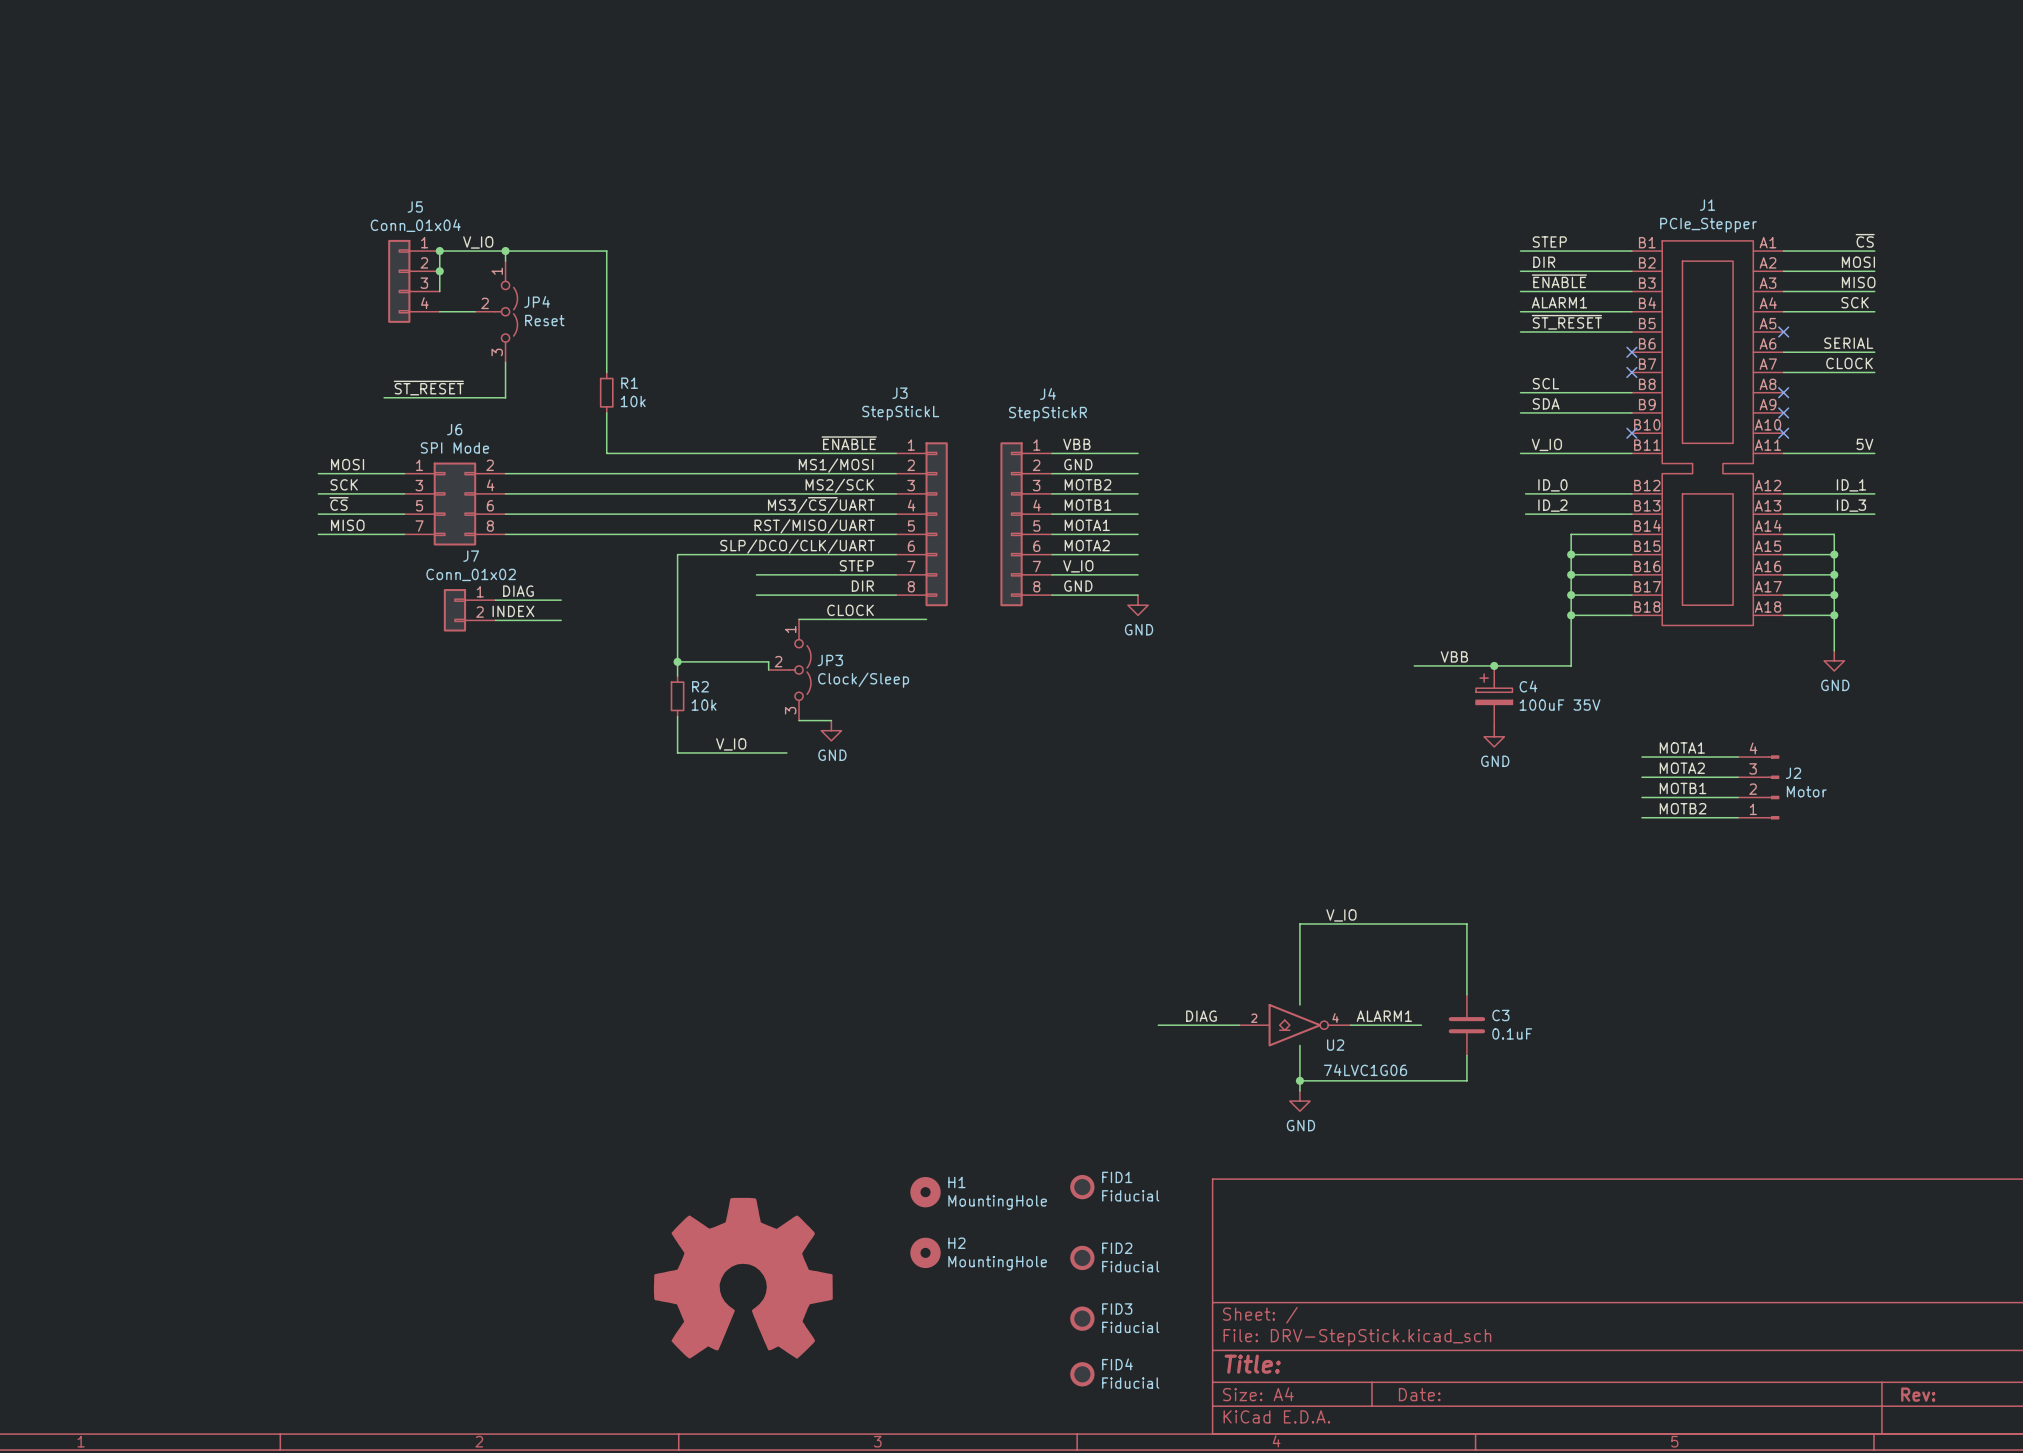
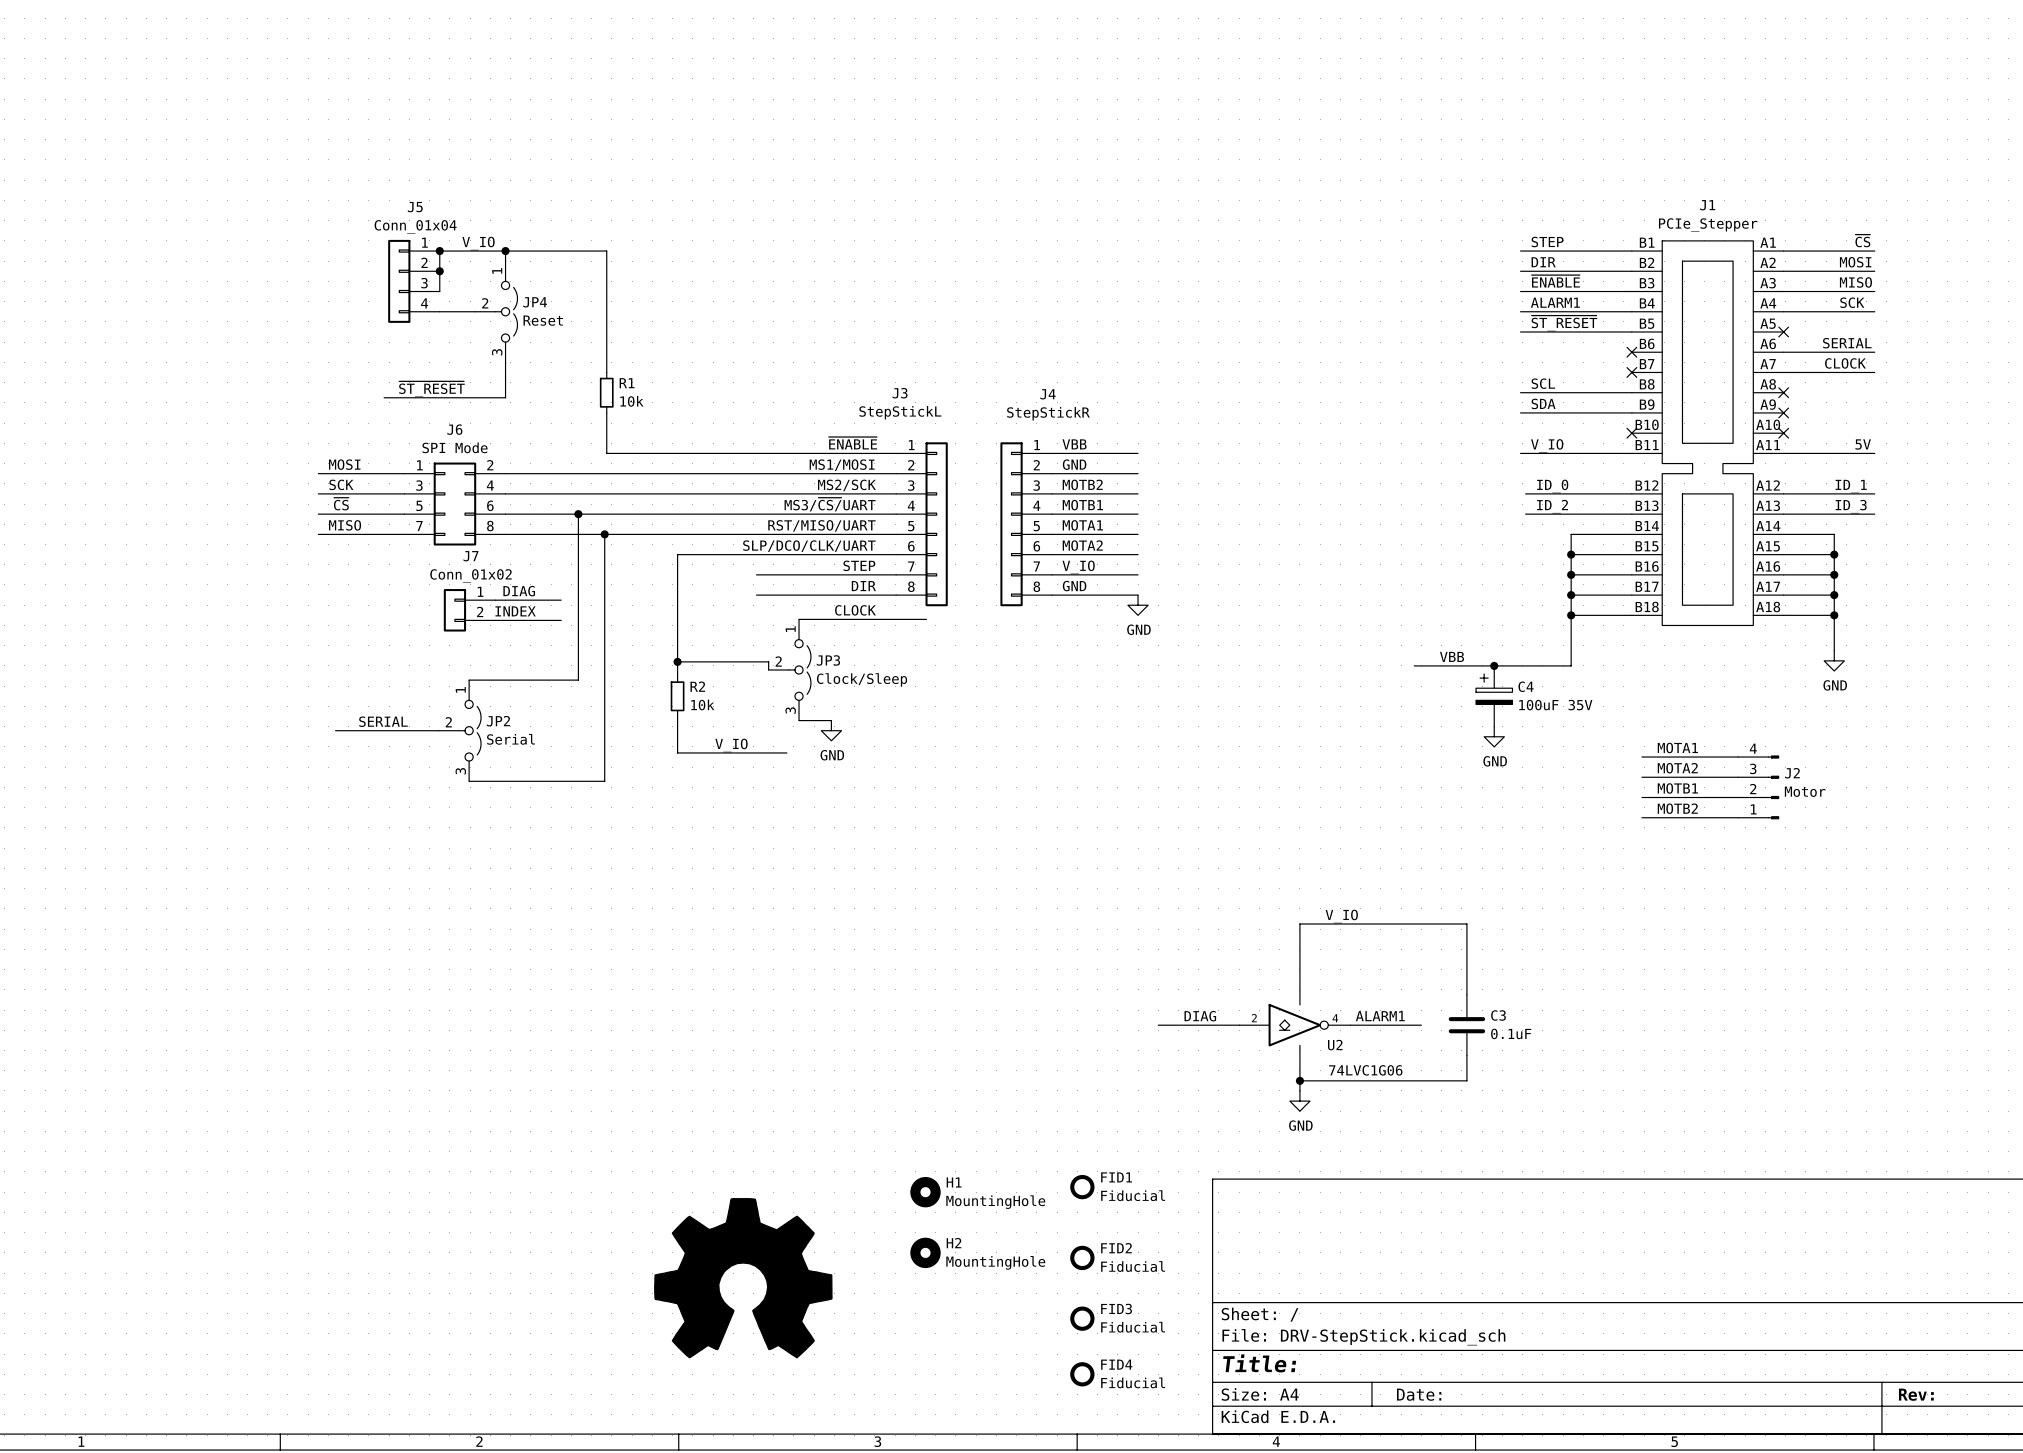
wire: none -> (578, 514) (578, 680) (469, 680)
junction: none -> (578, 514)
wire: none -> (604, 534) (604, 781) (469, 781)
junction: none -> (604, 534)
label: none -> SERIAL (383, 721)
wire: none -> (335, 730) (438, 730)
JP2: none -> Serial (459, 730)

